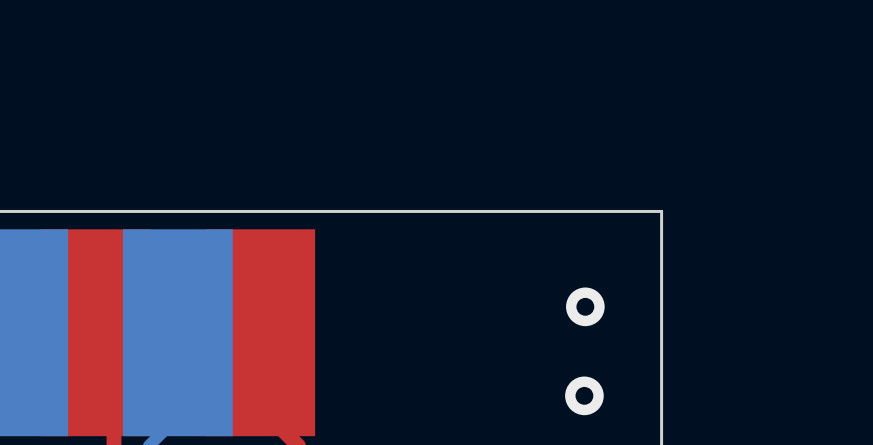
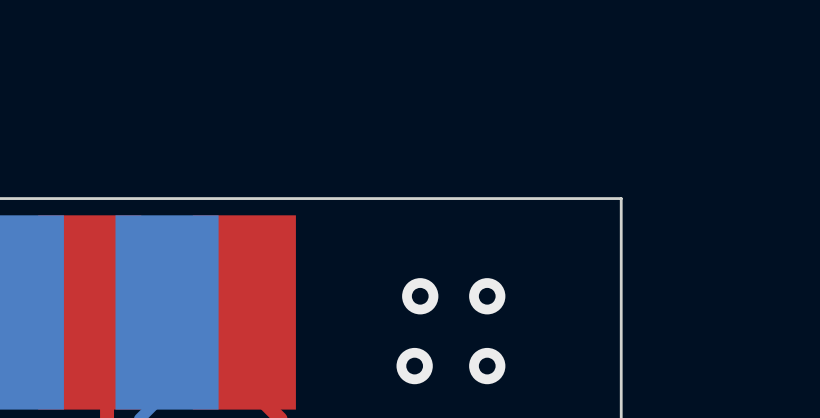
via: (585, 306) -> none
via: none -> (420, 296)
via: none -> (487, 296)
via: none -> (414, 366)
via: none -> (487, 366)
via: (584, 395) -> none

